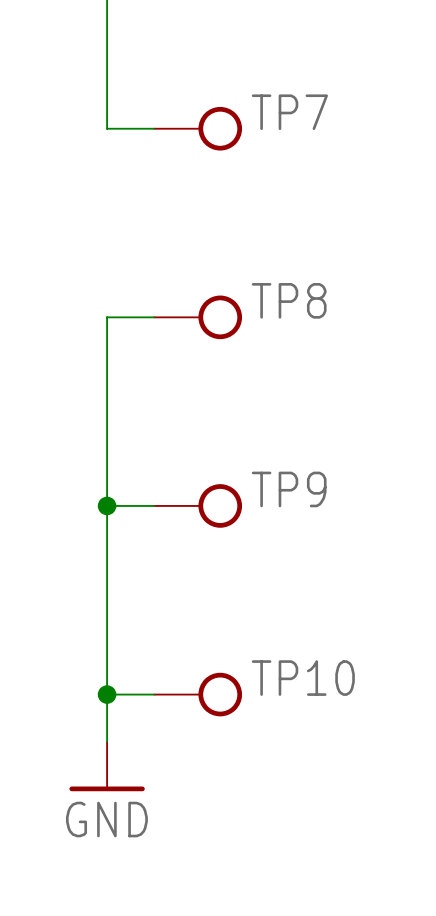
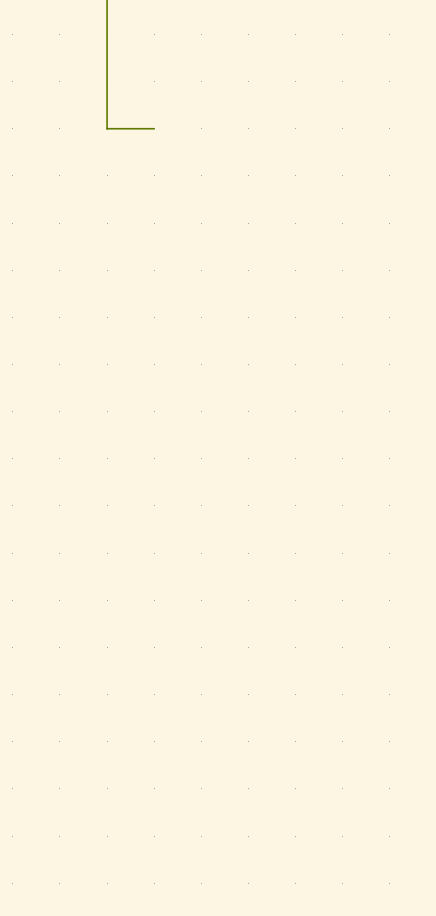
TP7: (198, 128) -> none
wire: (154, 317) (107, 317) (107, 741) -> none
TP8: (198, 317) -> none
wire: (107, 505) (154, 505) -> none
junction: (107, 505) -> none
TP9: (198, 505) -> none
wire: (107, 694) (154, 694) -> none
junction: (107, 694) -> none
TP10: (198, 694) -> none
power symbol: GND (107, 766) -> none

